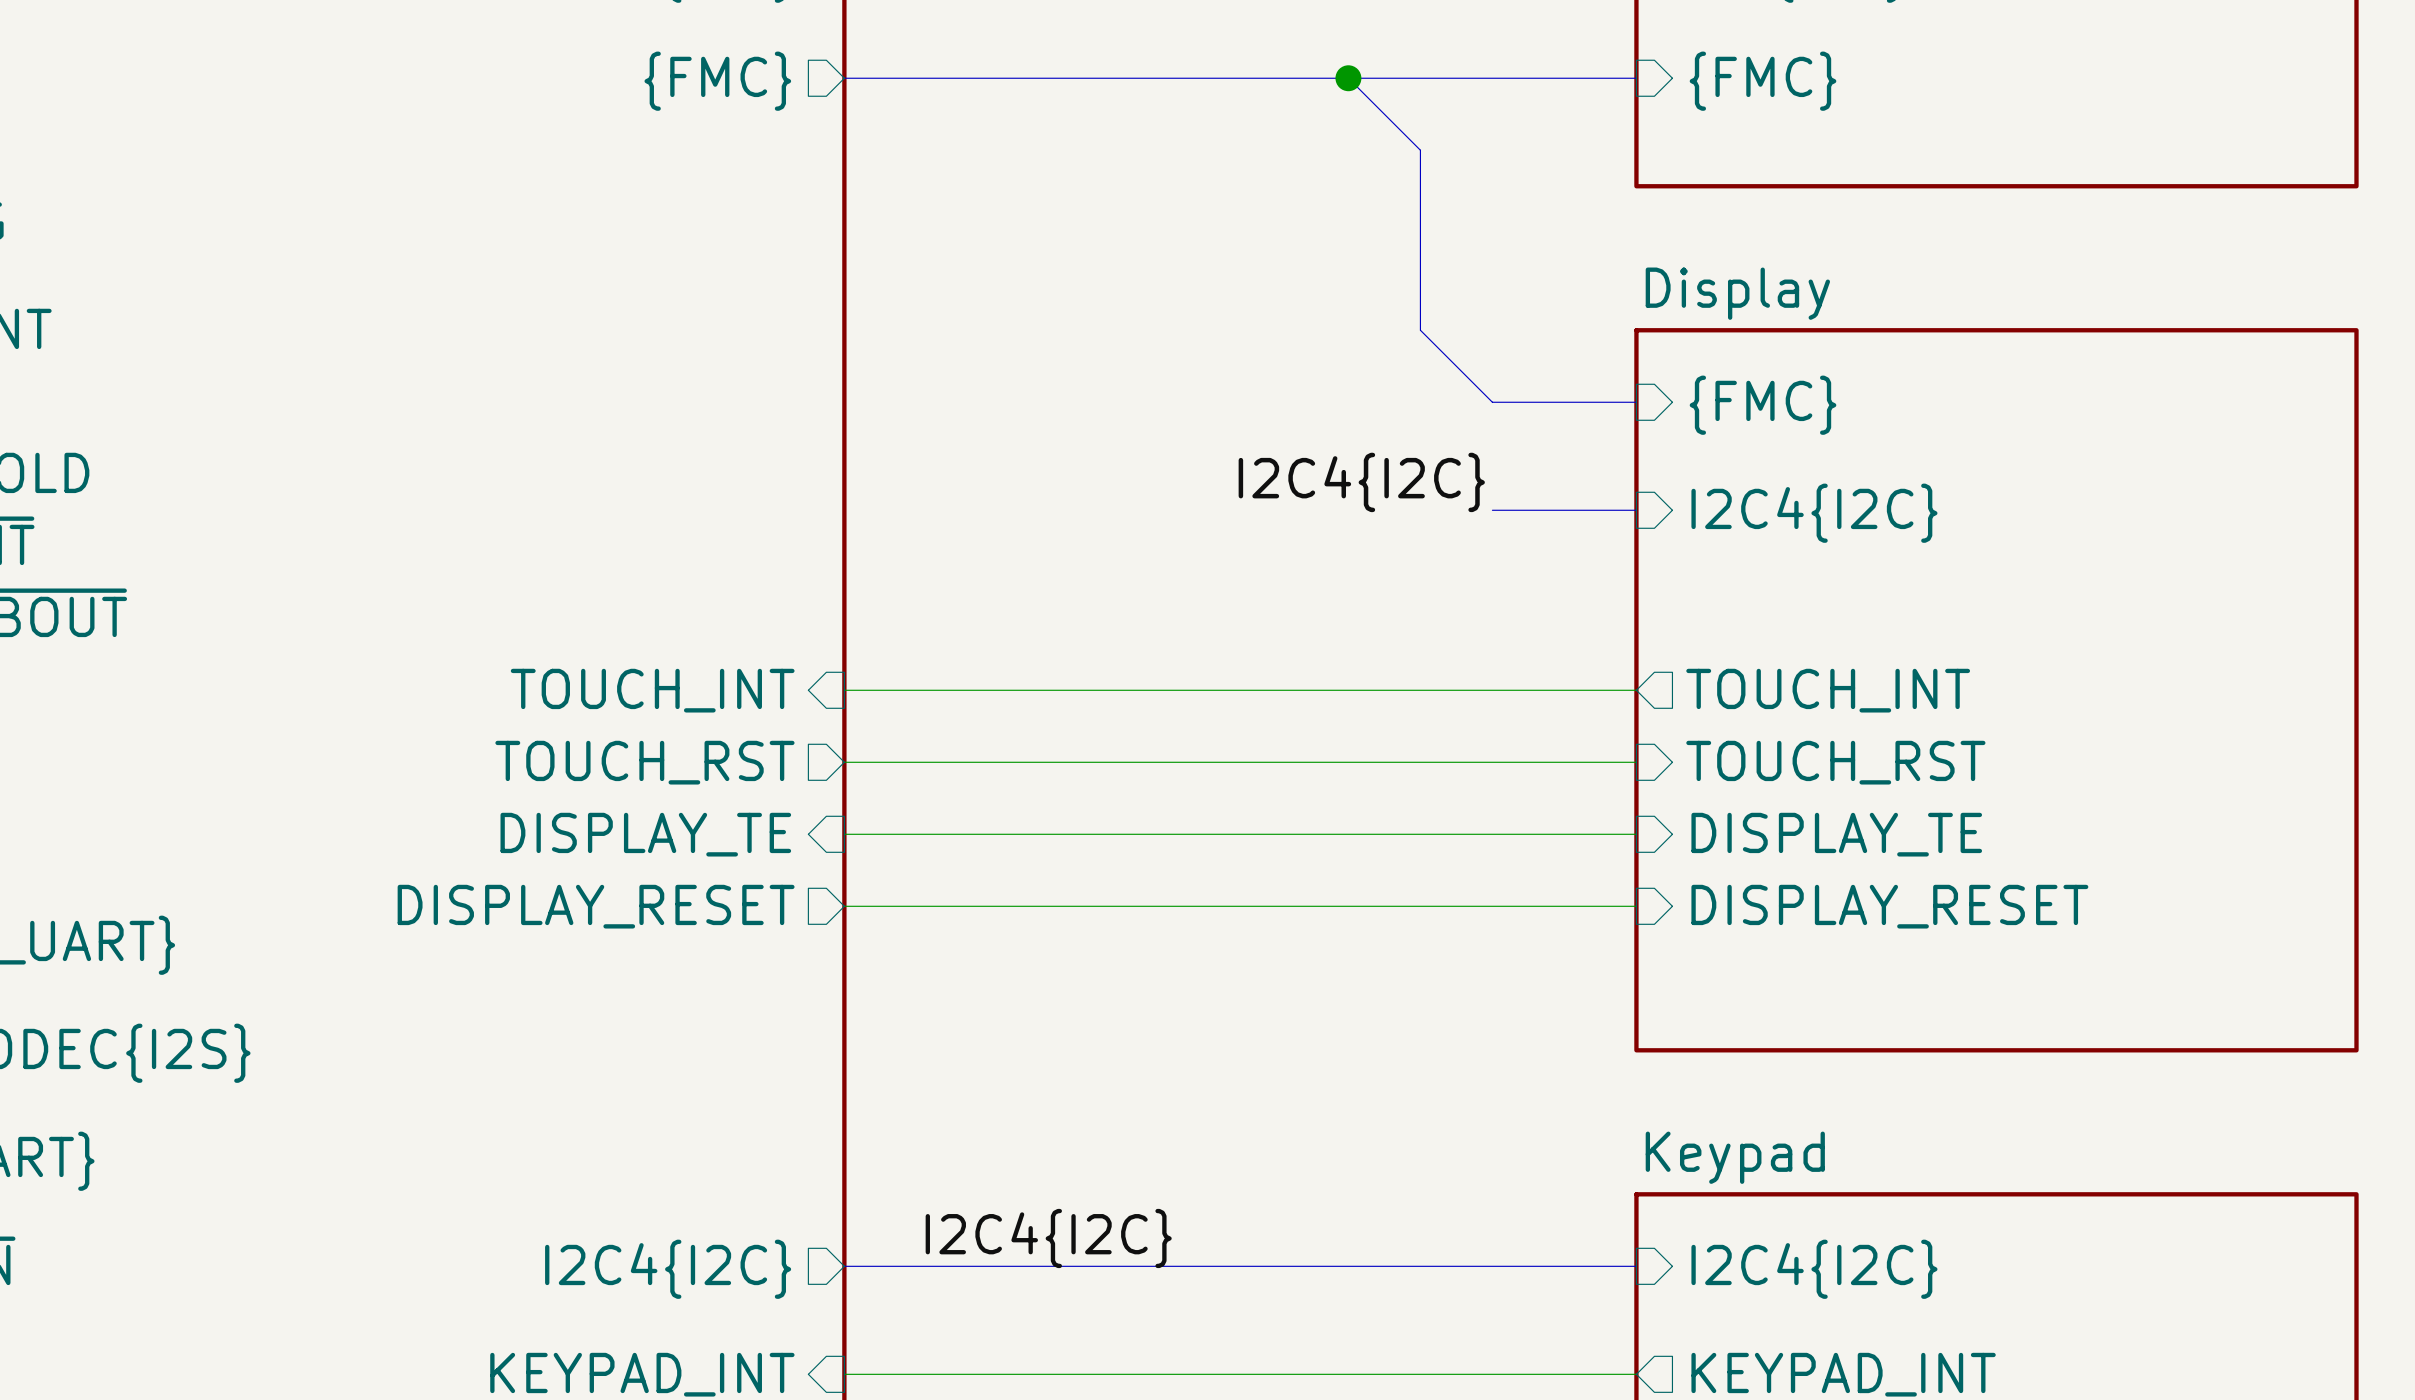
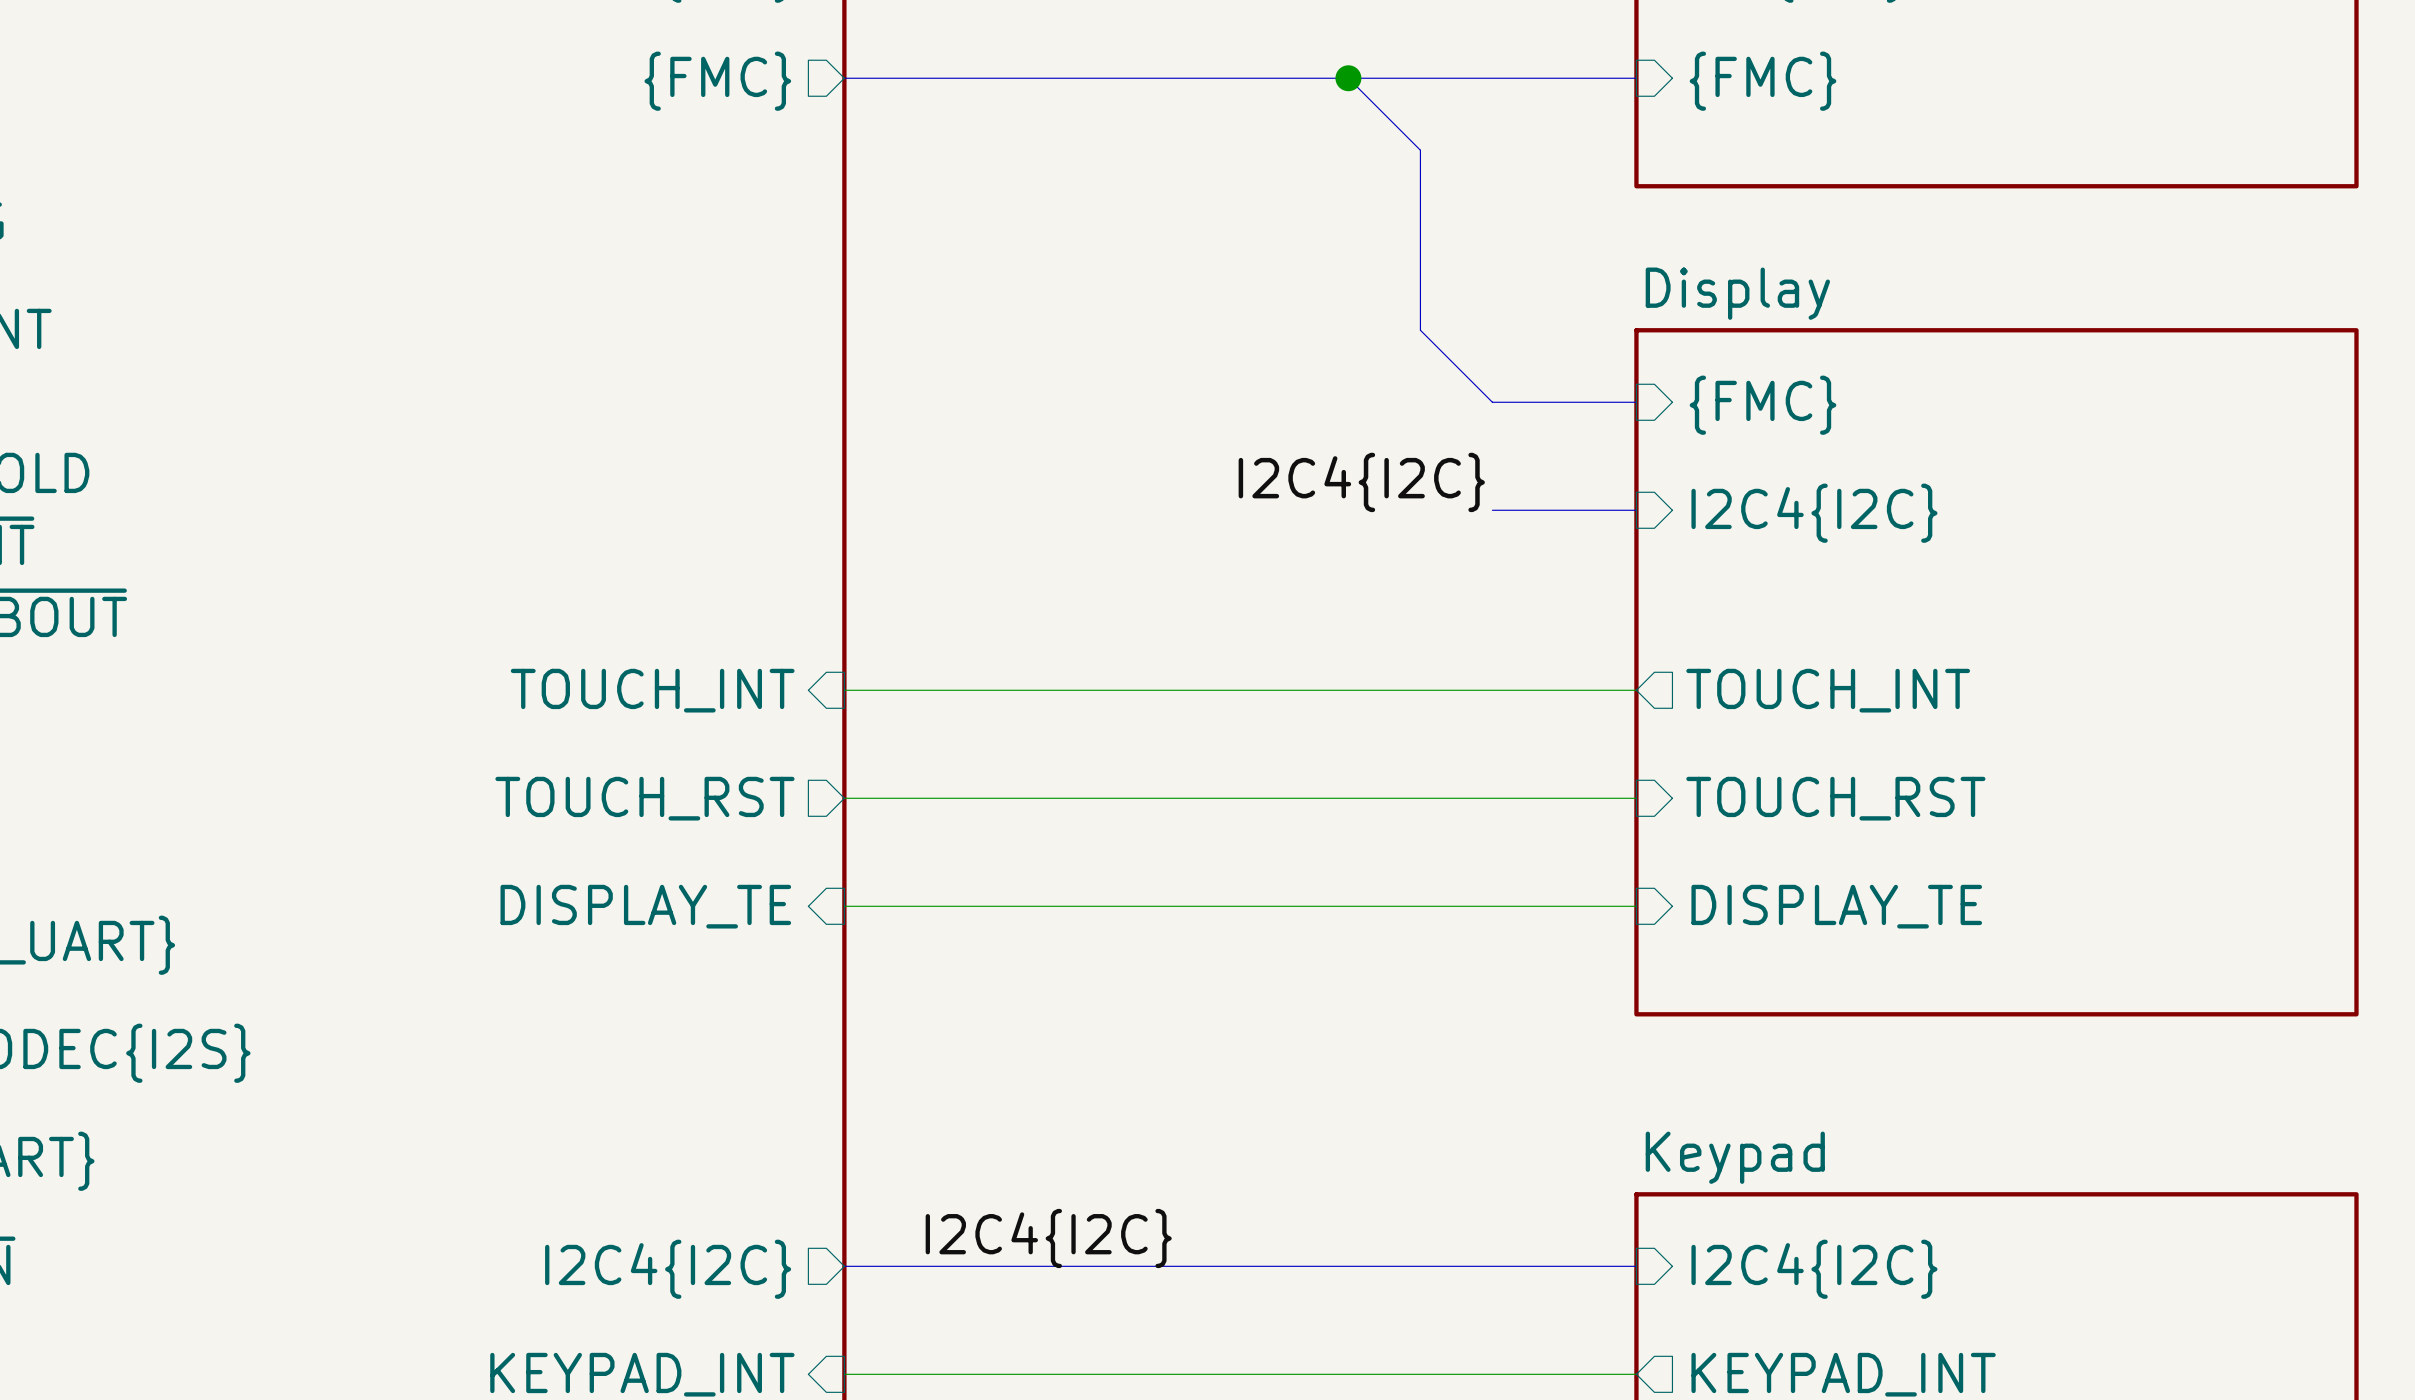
sheet Display shape: [1634, 328, 2359, 1053] -> [1634, 328, 2359, 1017]
sheet pin position: TOUCH_RST (644, 762) -> TOUCH_RST (644, 798)
wire: (844, 762) (1636, 762) -> (844, 798) (1636, 798)
sheet pin position: TOUCH_RST (1835, 762) -> TOUCH_RST (1835, 798)
sheet pin: DISPLAY_TE (645, 834) -> none
wire: (844, 834) (1636, 834) -> none
sheet pin: DISPLAY_TE (1836, 834) -> none
sheet pin shape: output (596, 906) -> input (645, 906)
sheet pin: DISPLAY_RESET (596, 906) -> DISPLAY_TE (645, 906)
sheet pin: DISPLAY_RESET (1889, 906) -> DISPLAY_TE (1836, 906)

